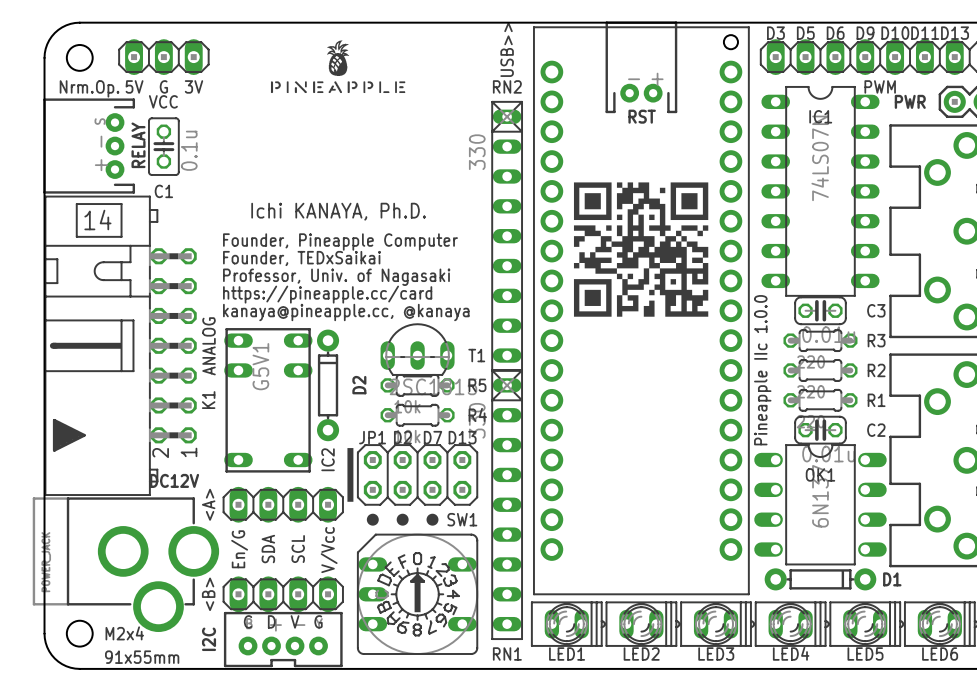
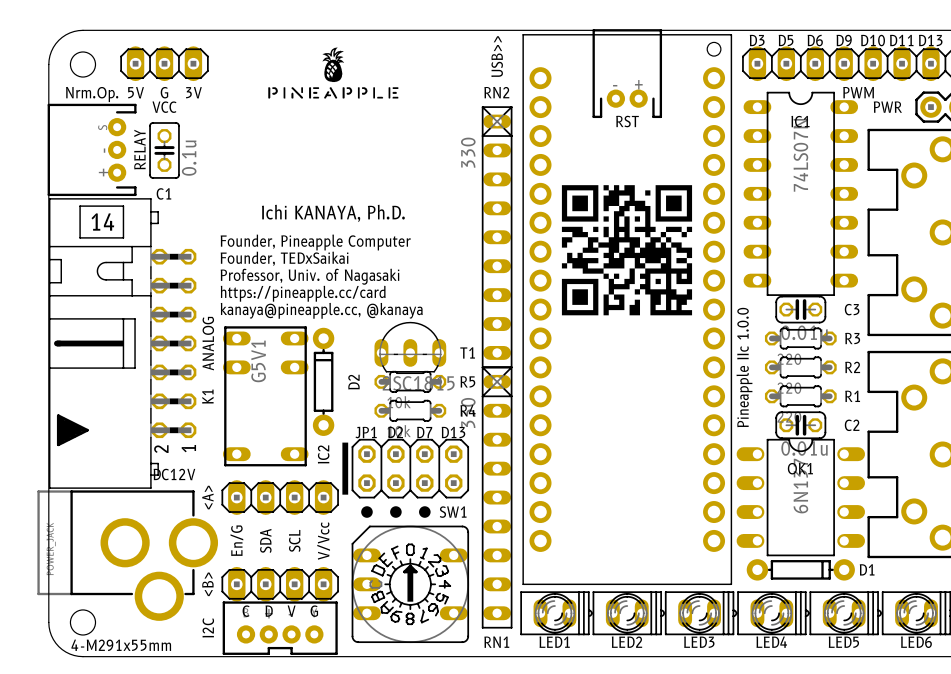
text: M2x4 (124, 633) -> none
text: none -> 4-M2 (88, 645)

